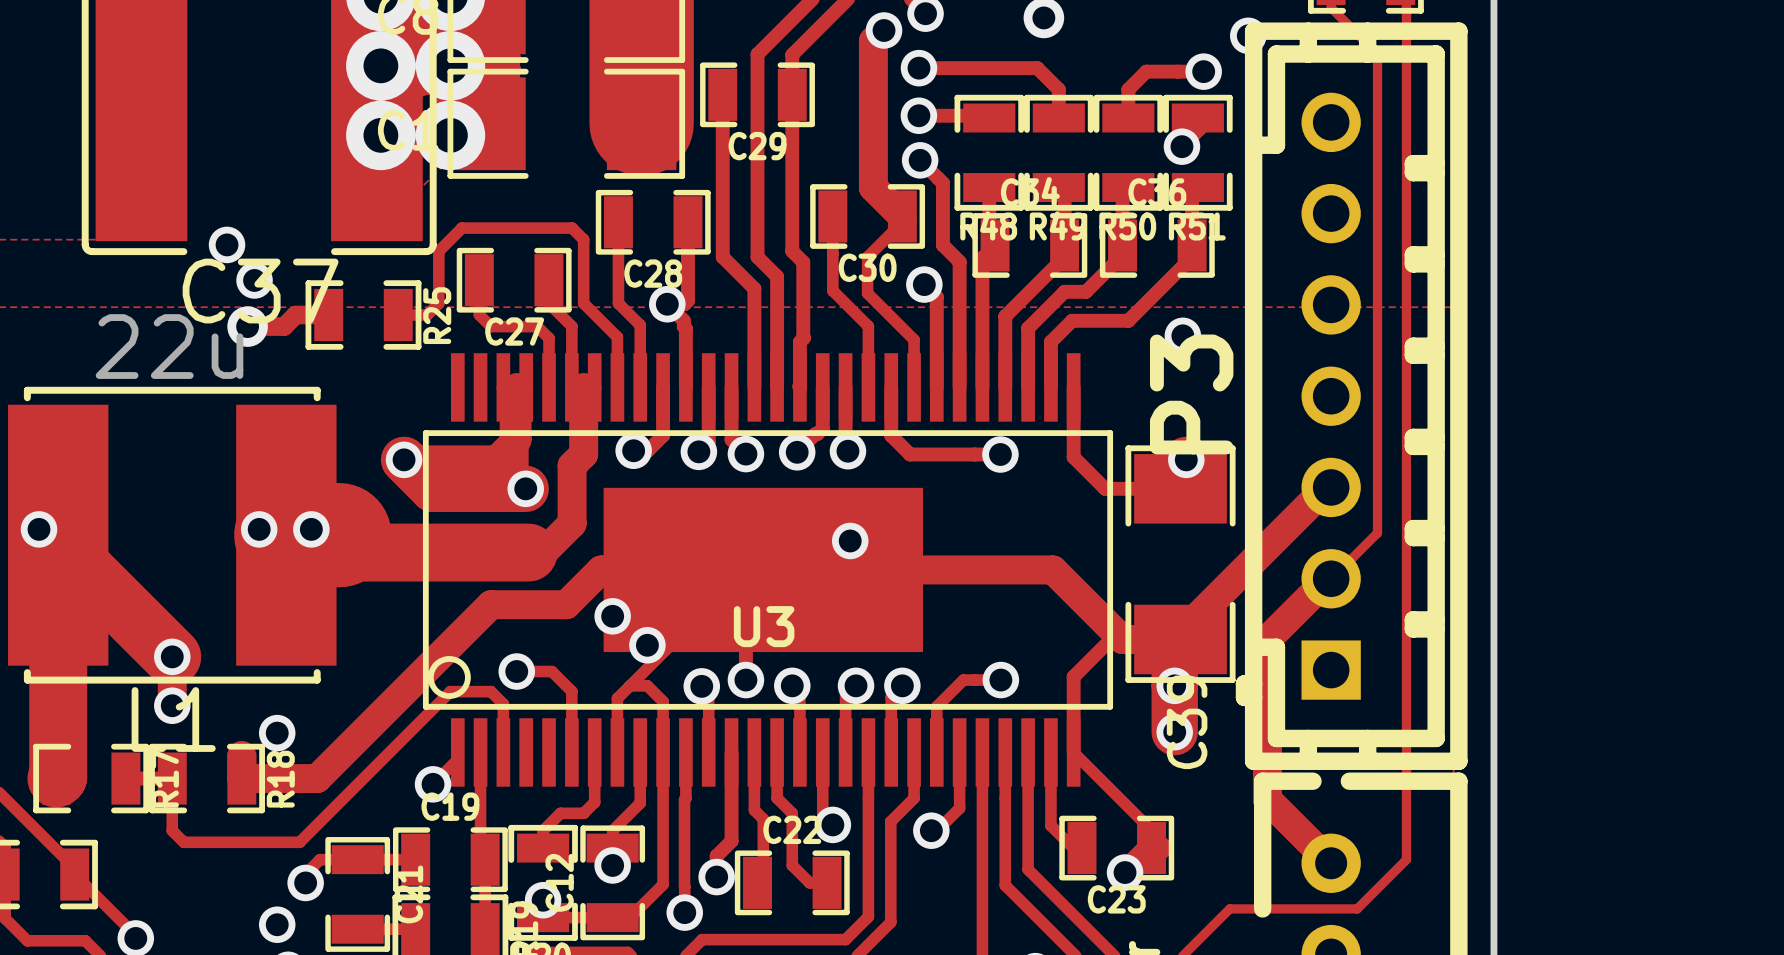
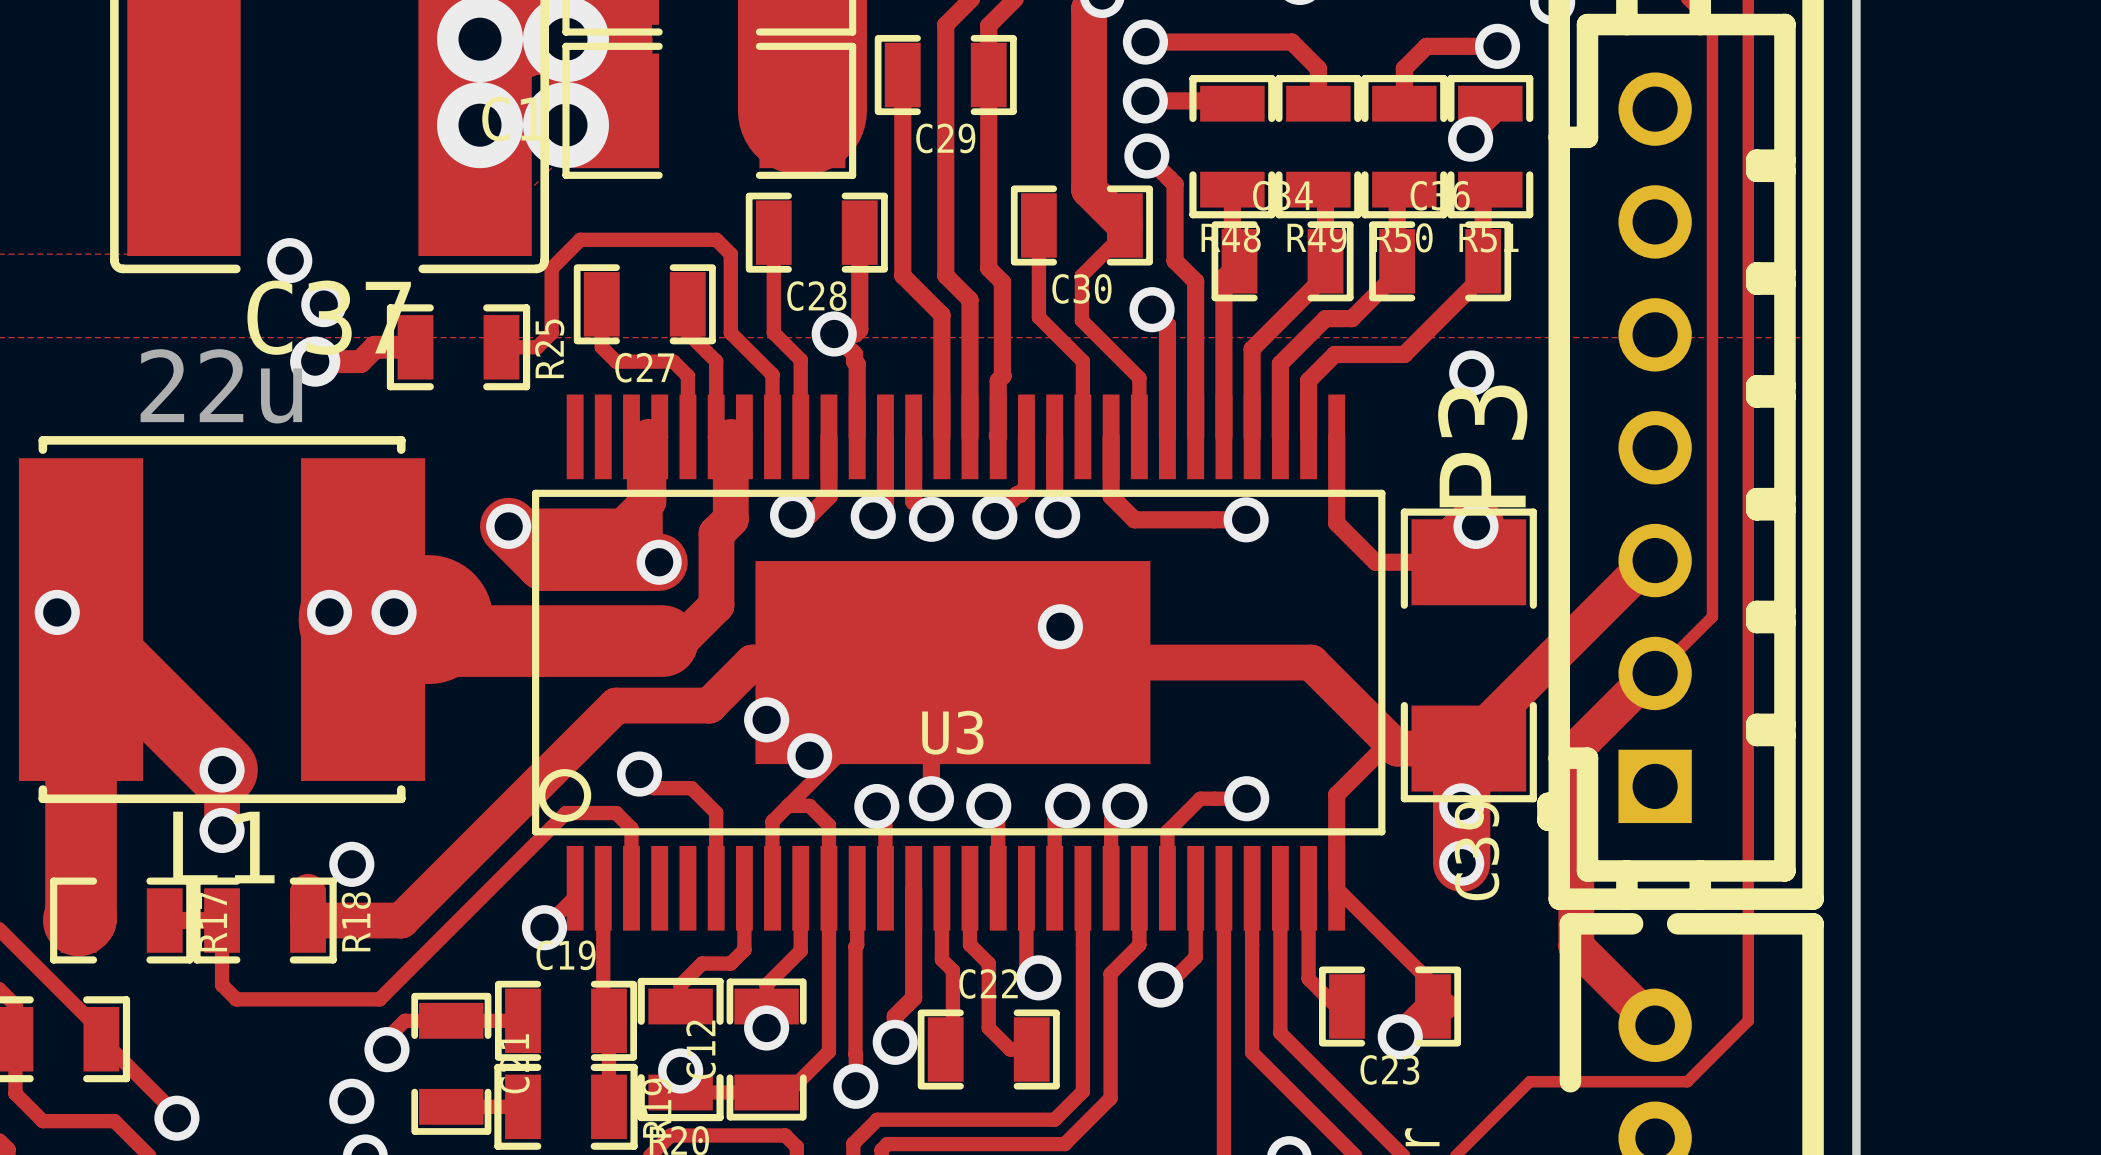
via position: (516, 671) -> (639, 774)

